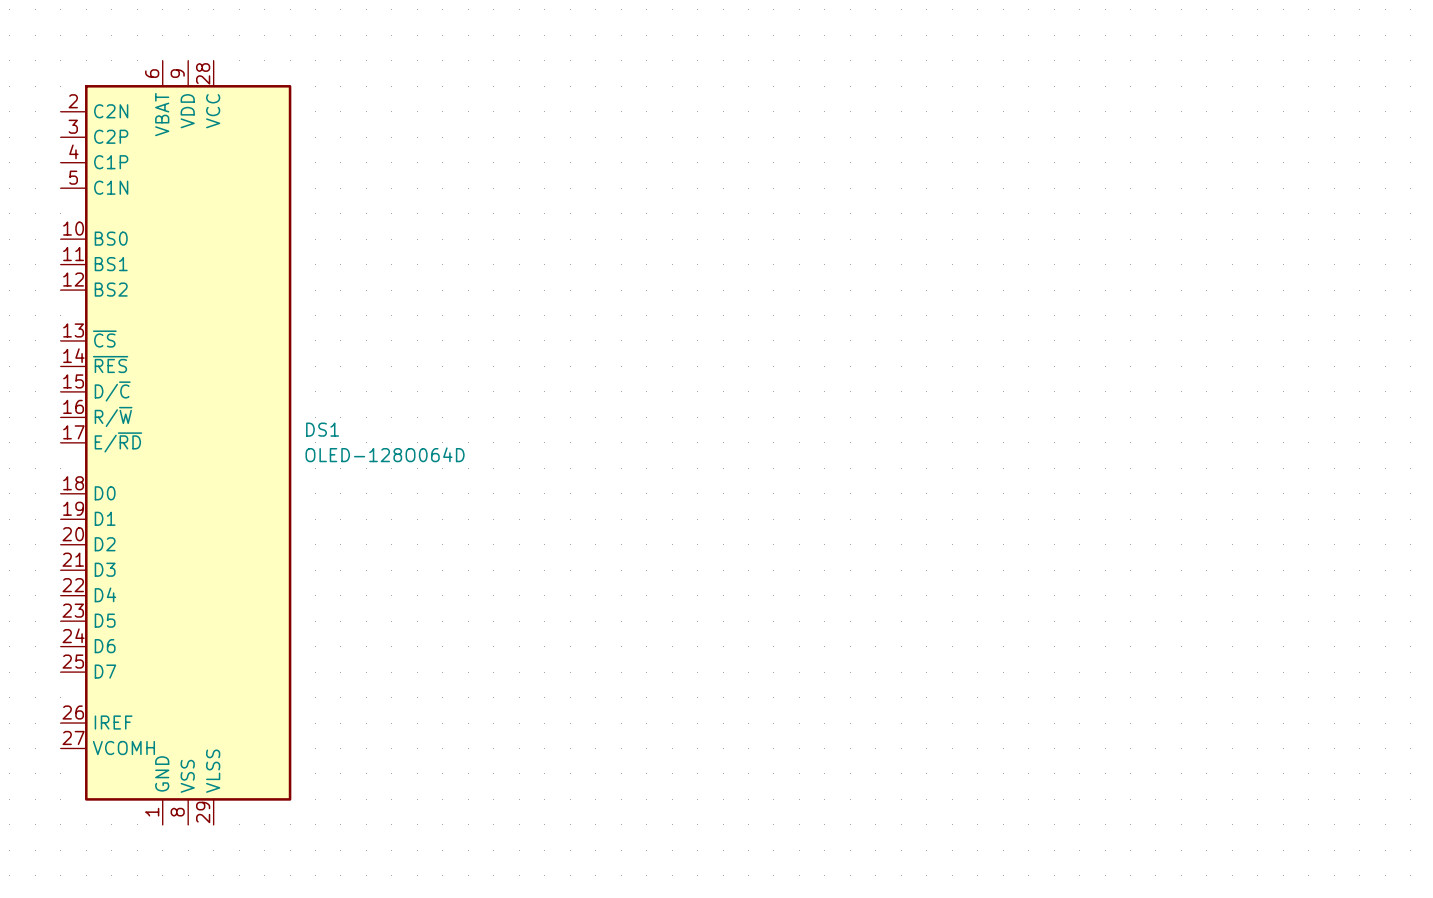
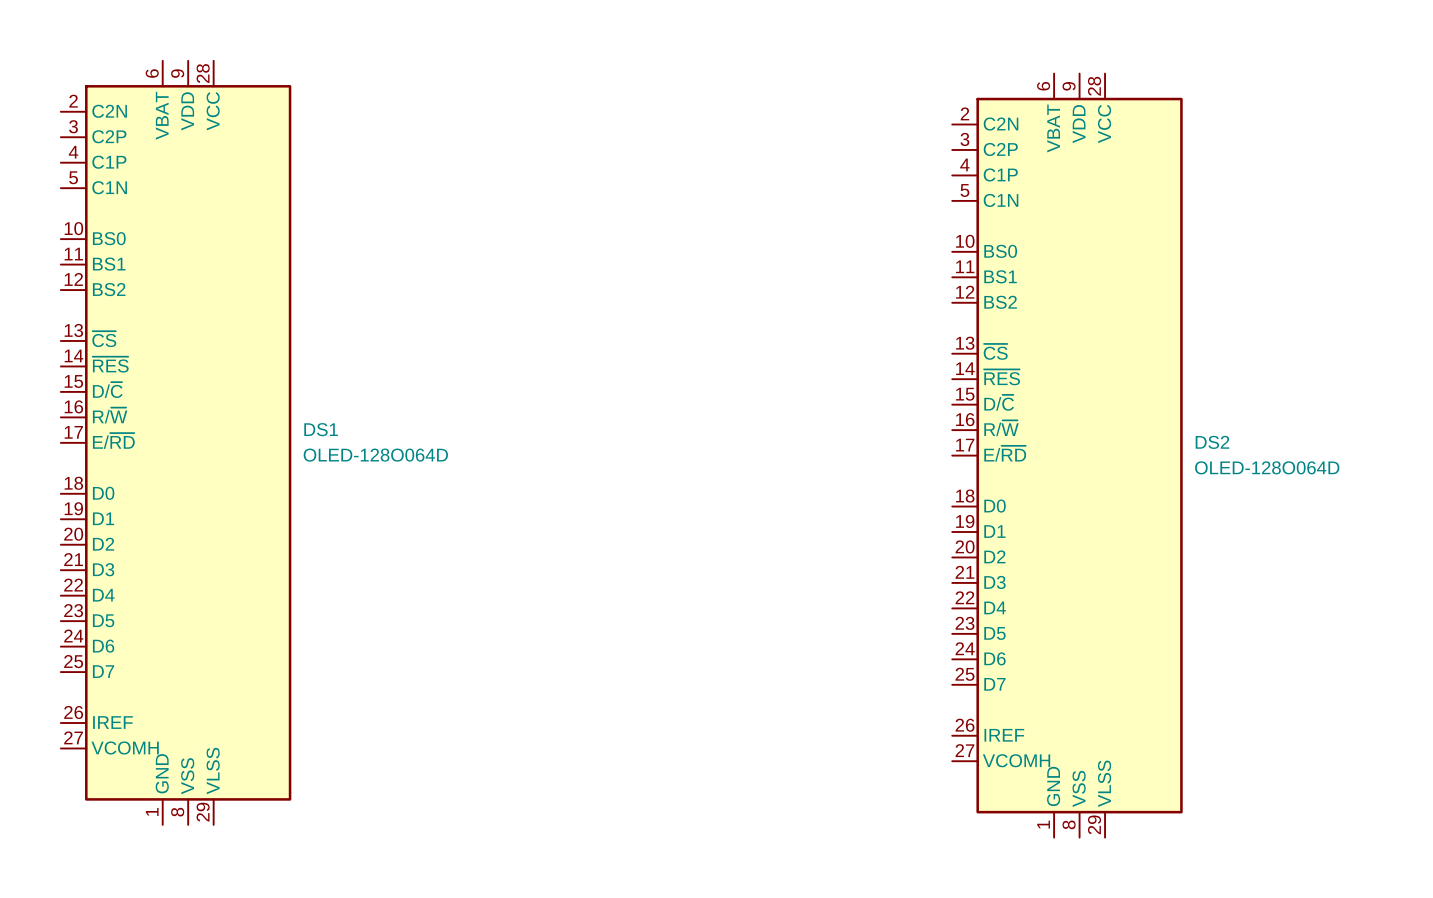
DS2: none -> OLED-128O064D (1067, 455)

